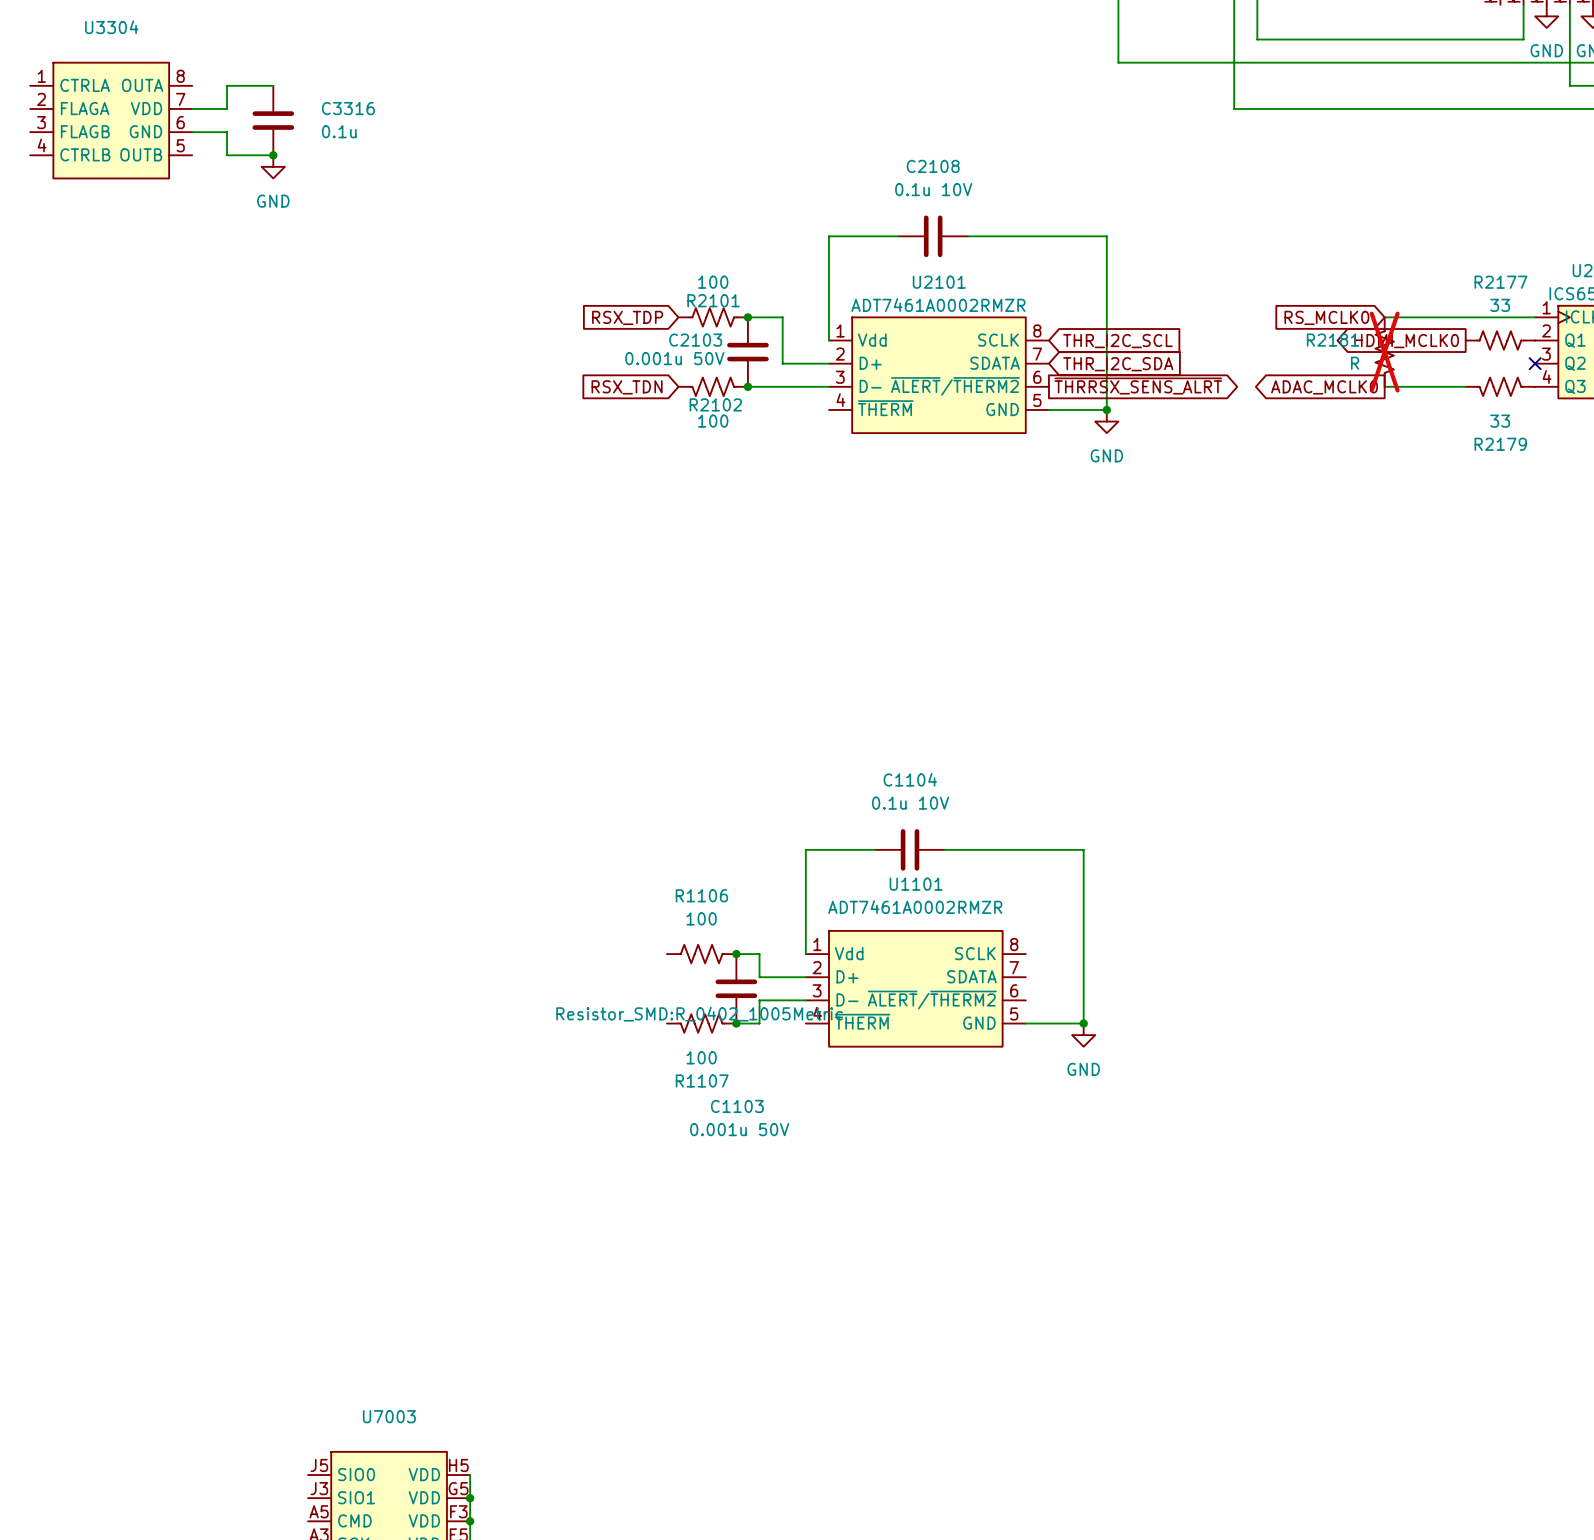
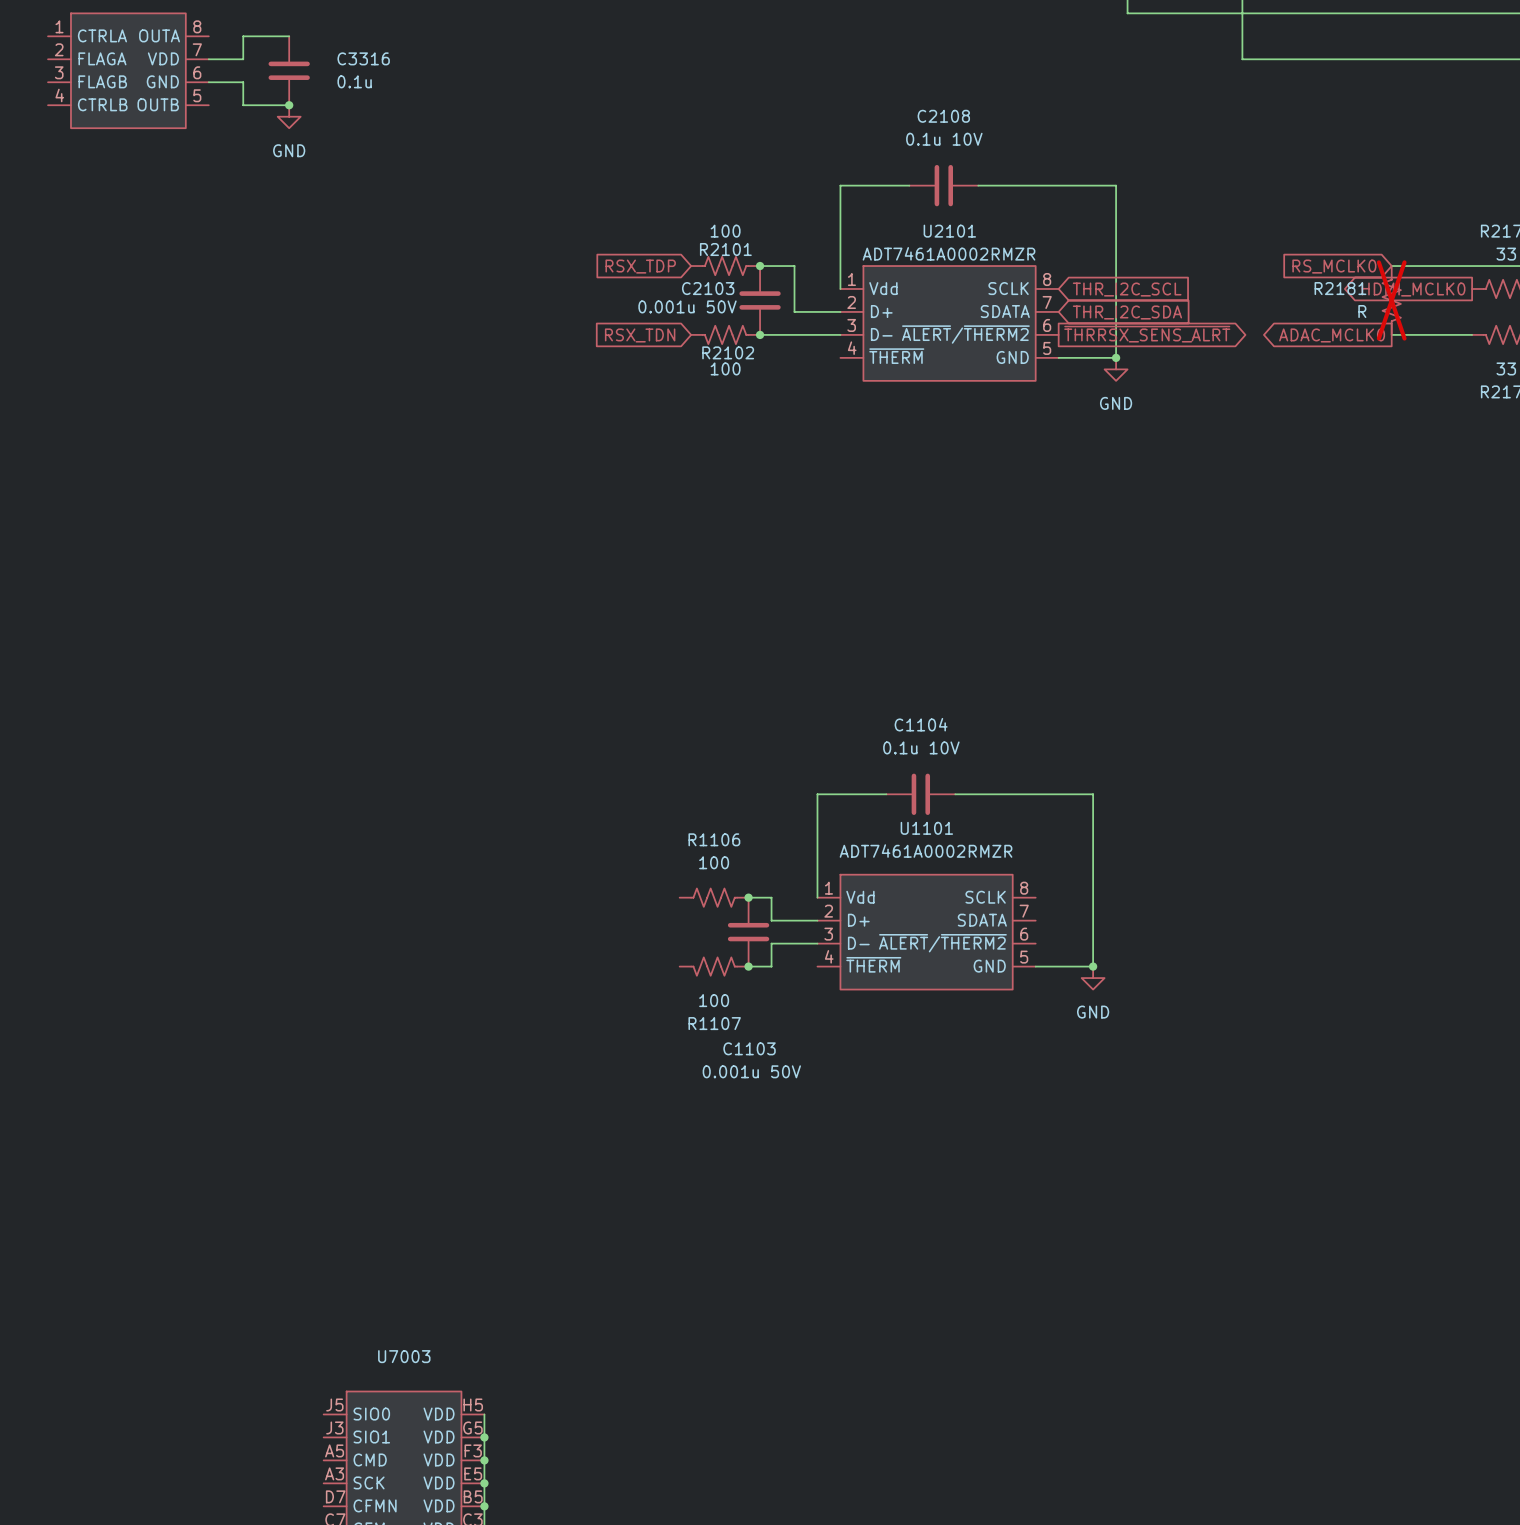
R1107 text: Resistor_SMD:R_0402_1005Metric (699, 1014) -> none

